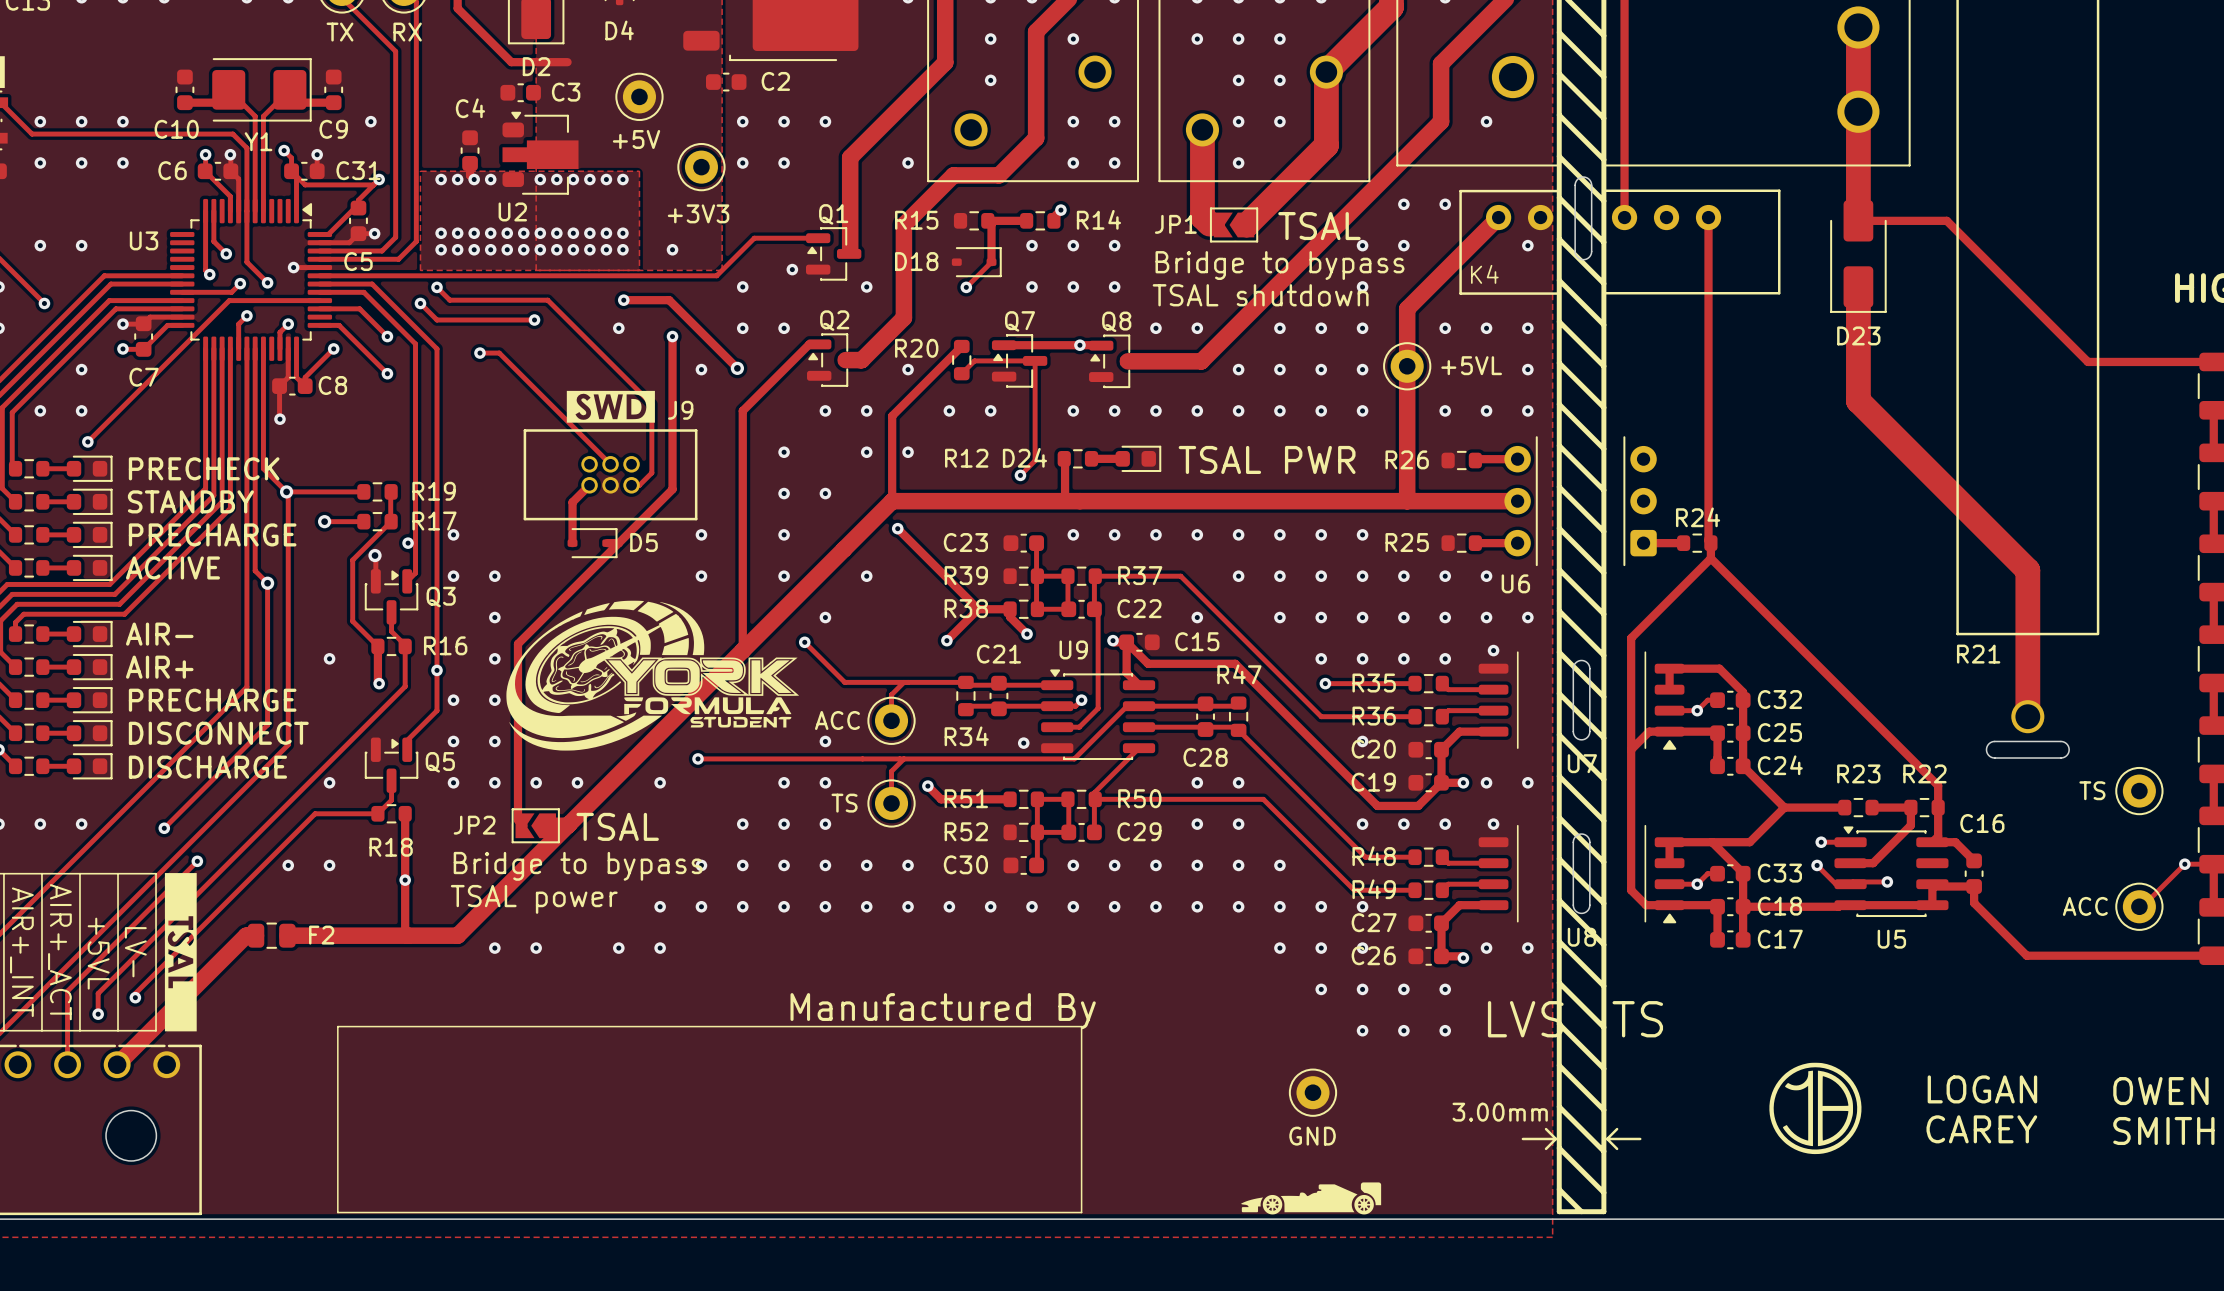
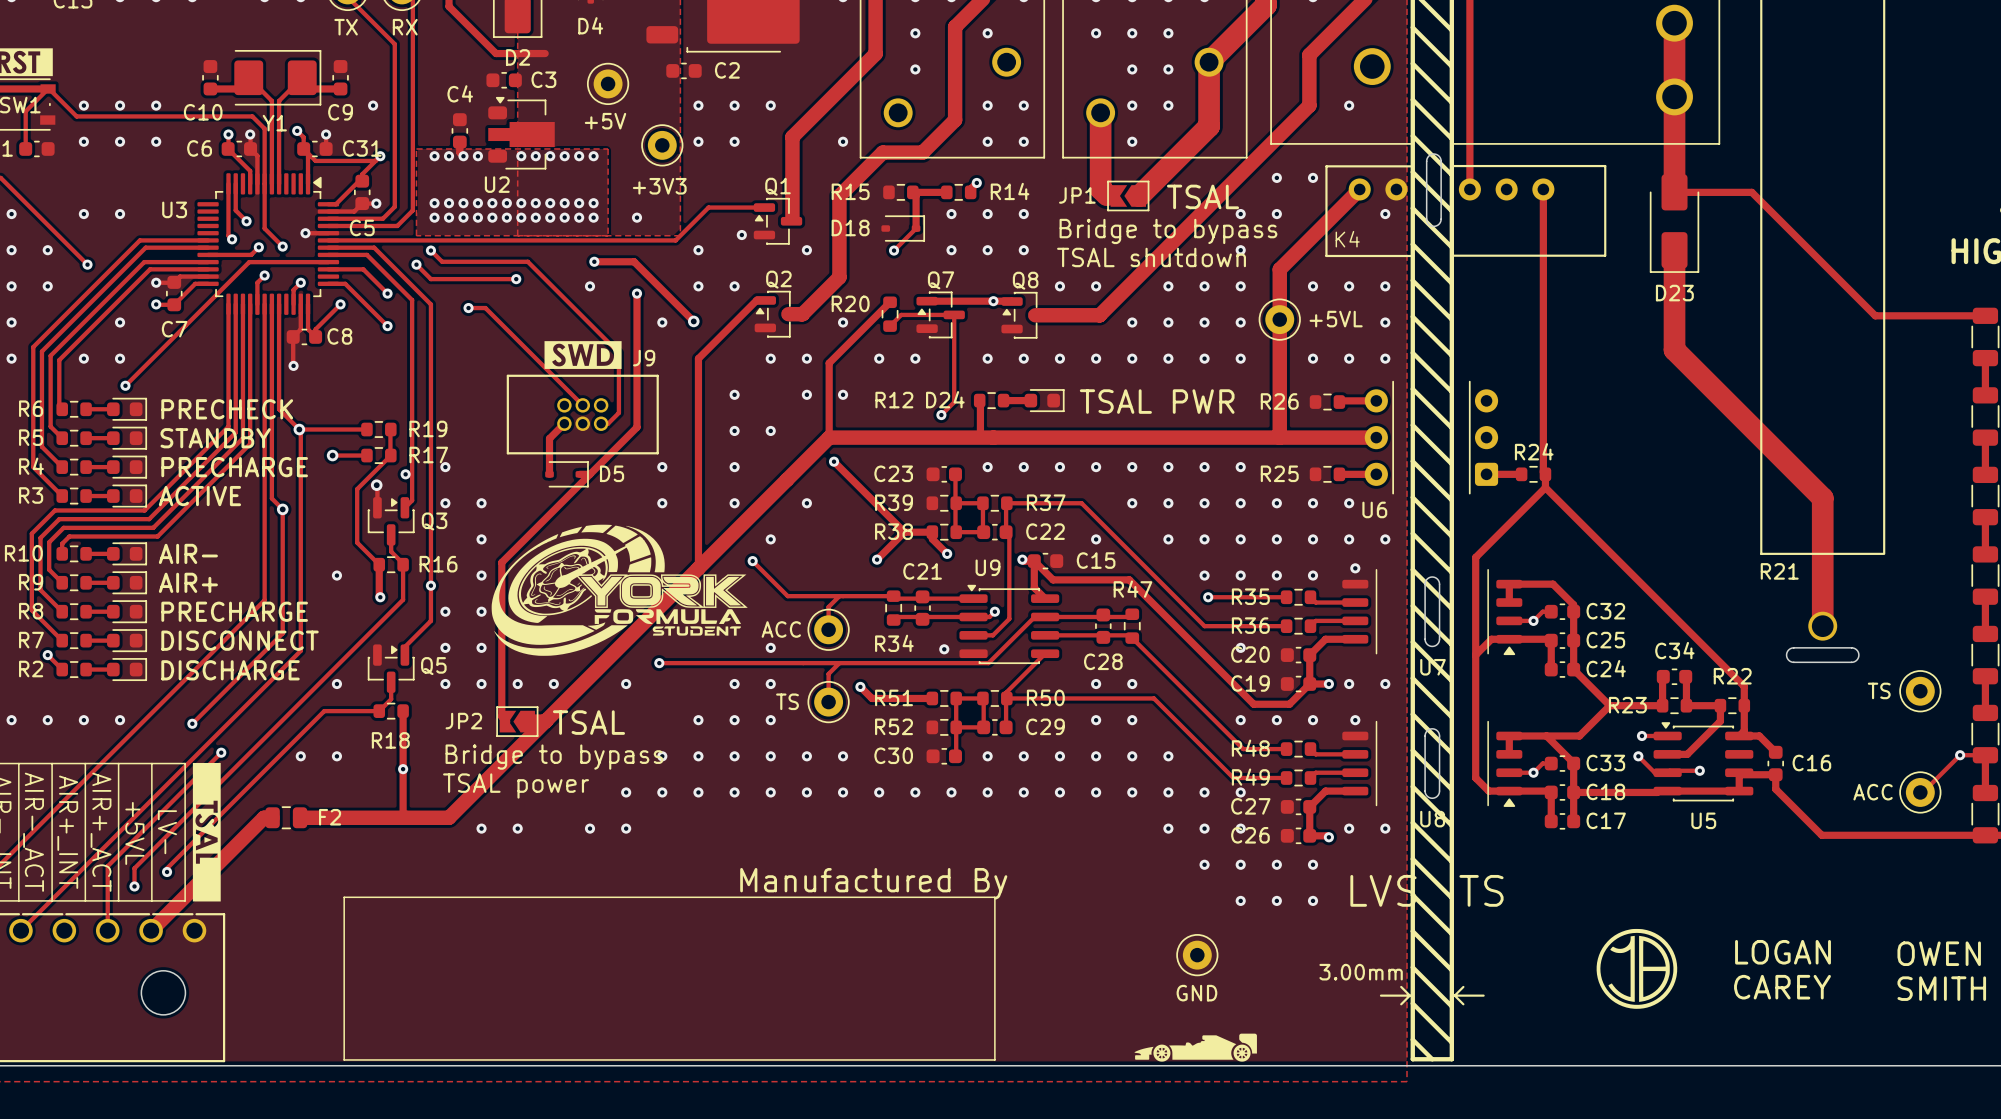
R23 name position: R23 (1858, 773) -> R23 (1627, 705)
track: none -> (1663, 676) (1662, 705)
C34: none -> (1674, 676)
track: none -> (1685, 676) (1686, 705)
C16 name position: C16 (1982, 823) -> C16 (1811, 763)

